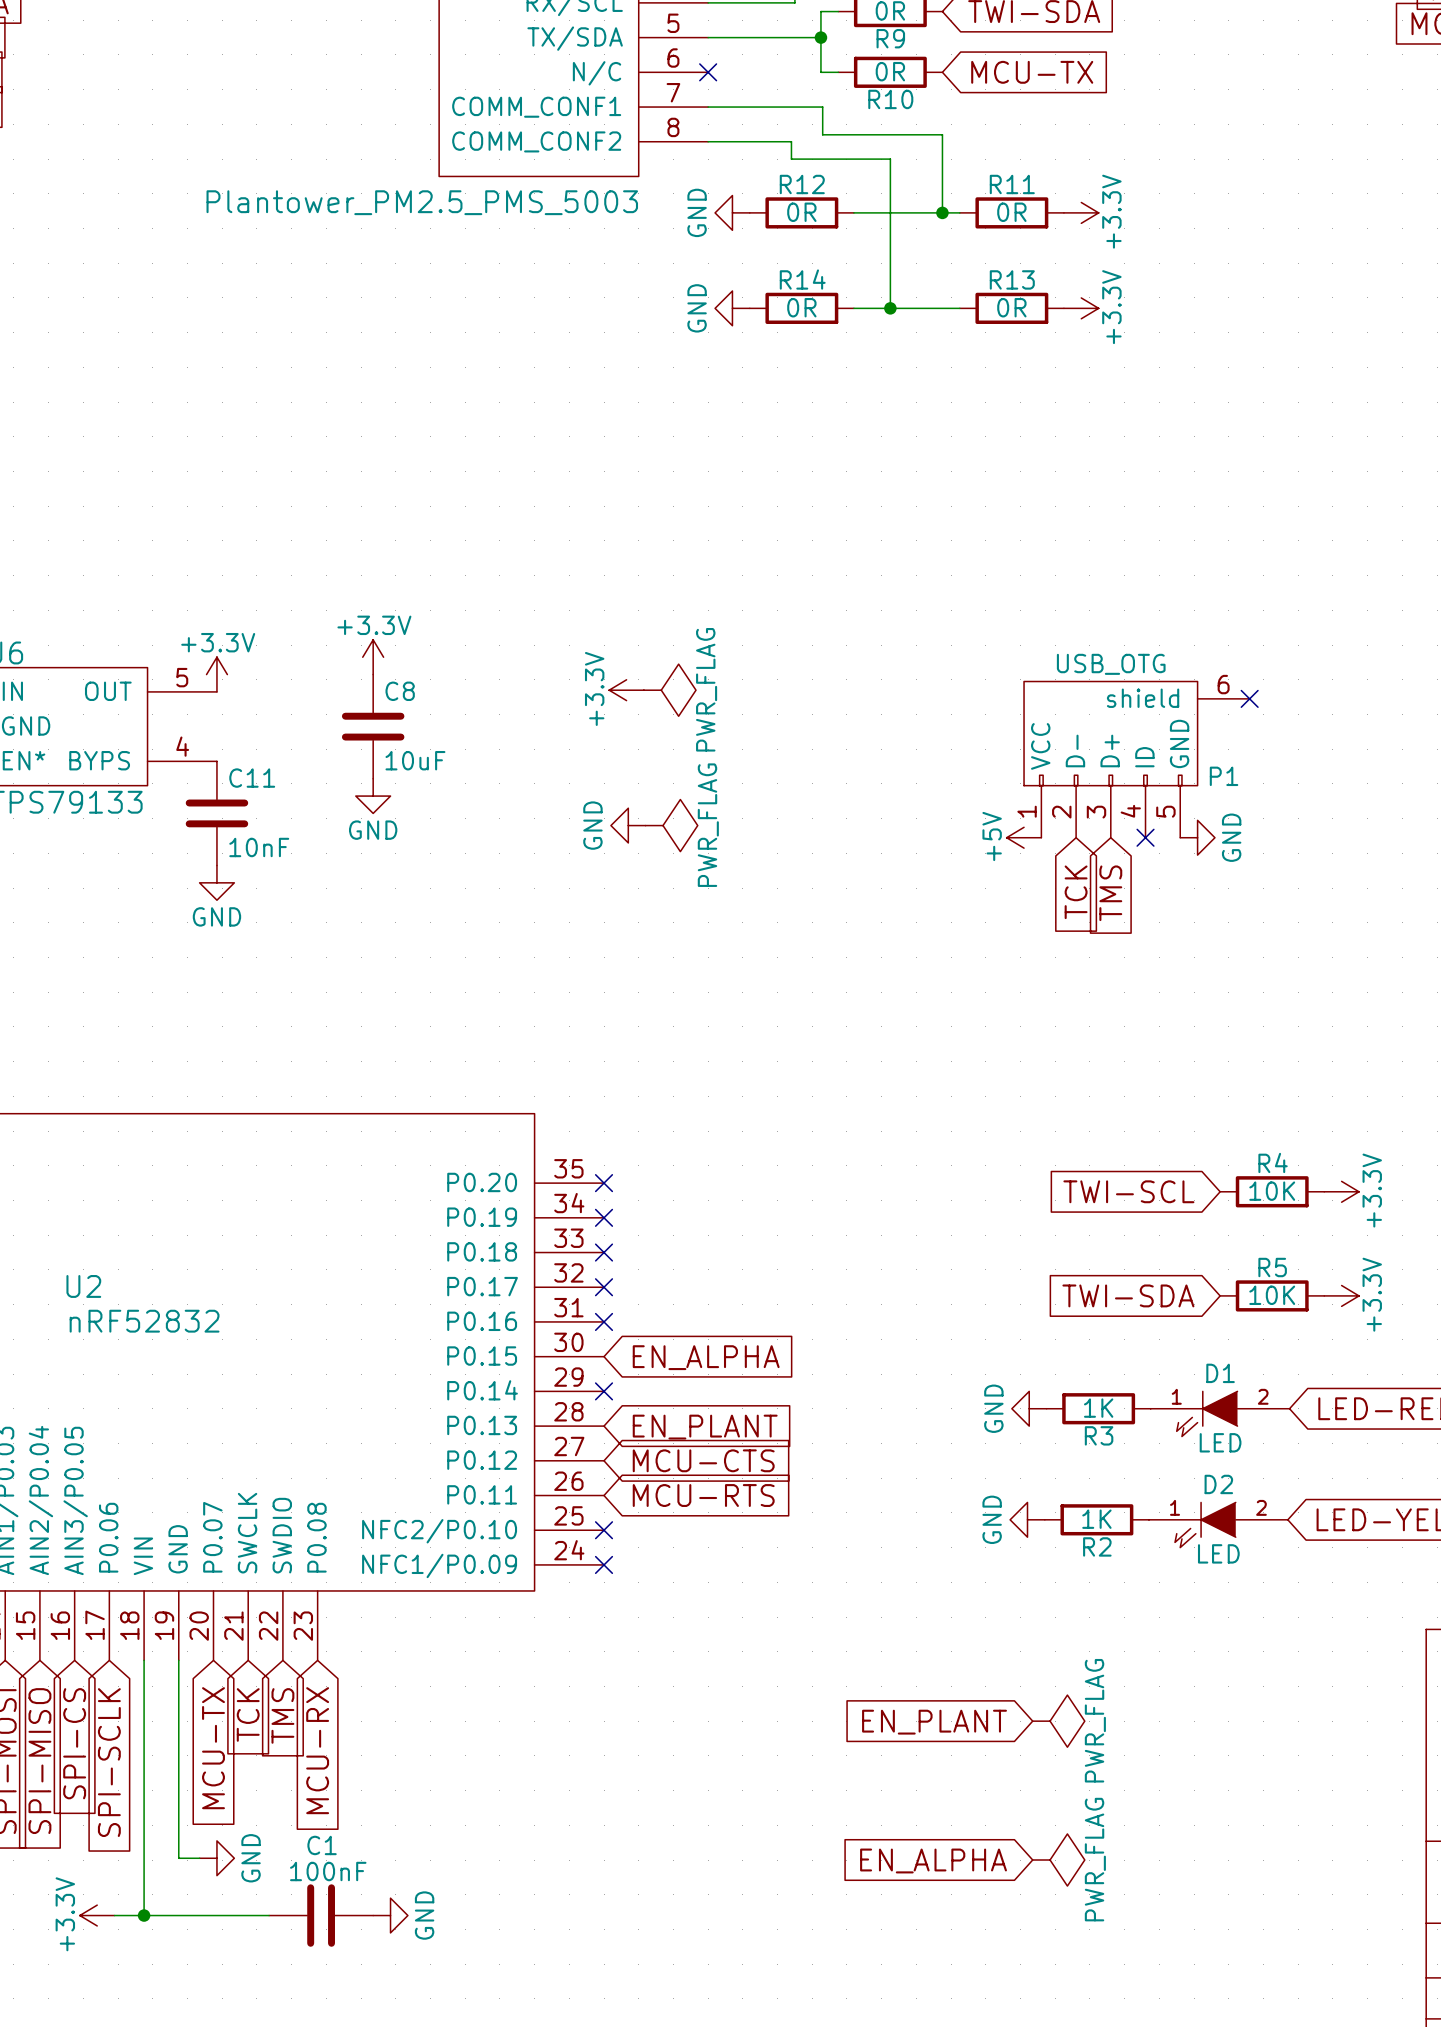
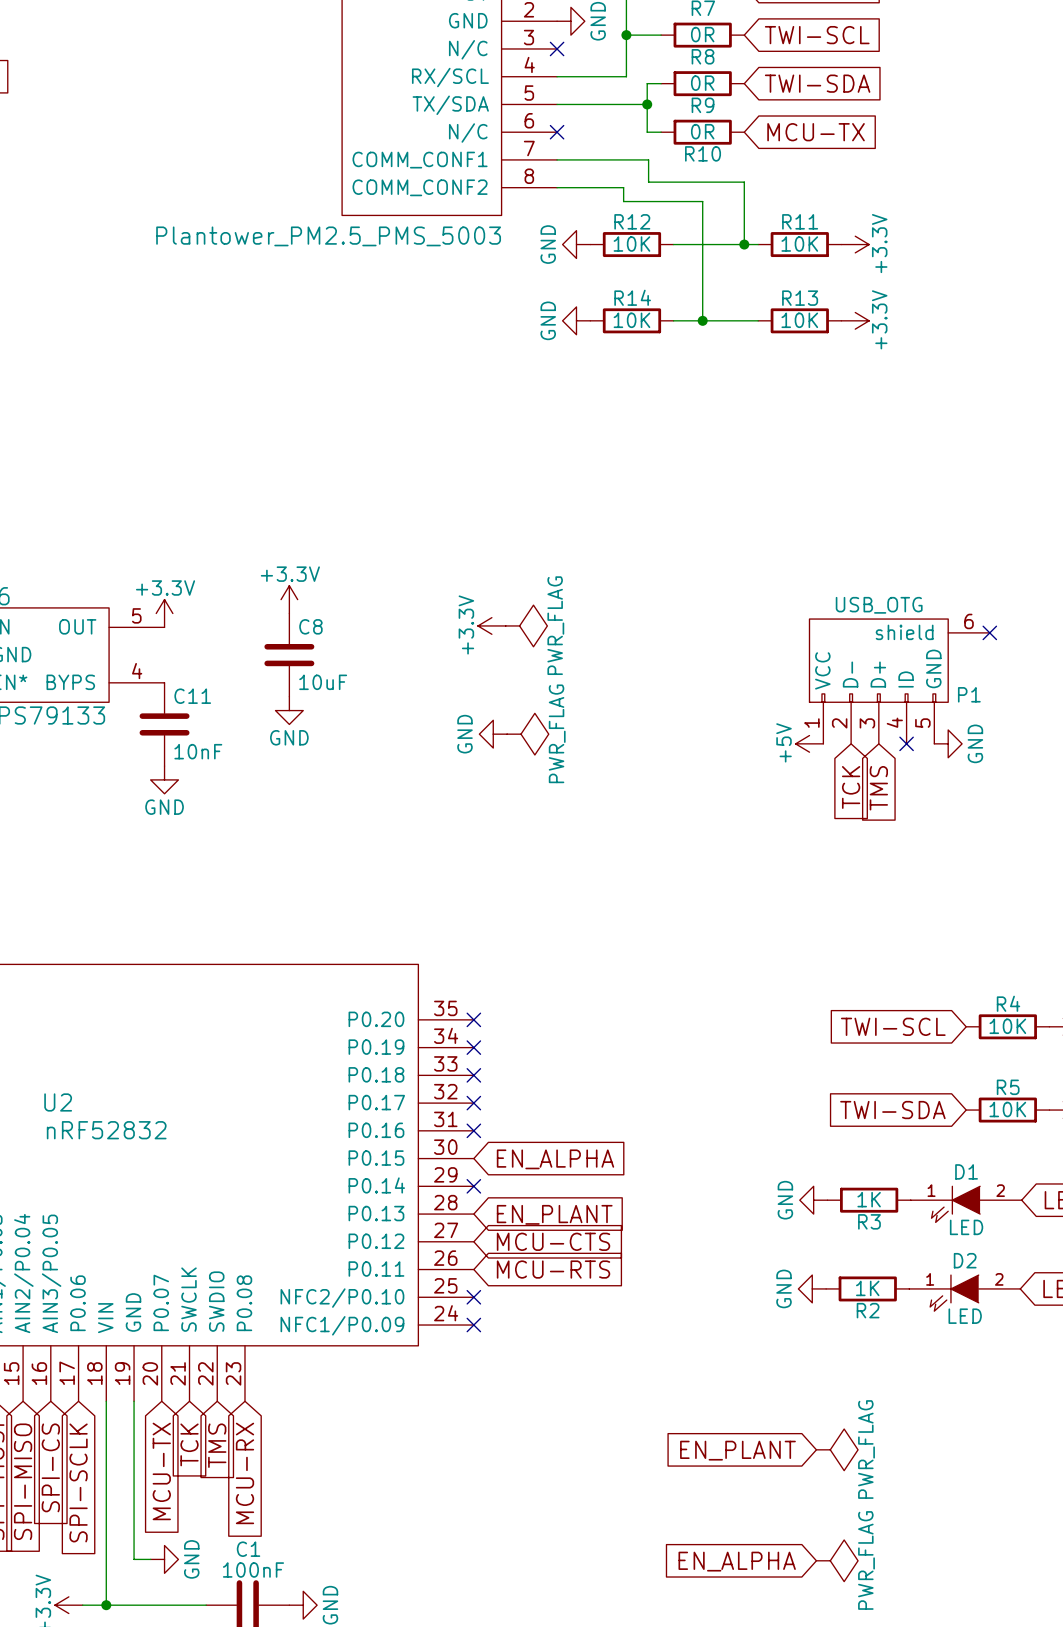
R12 value: 0R (801, 212) -> 10K (631, 244)
R11 value: 0R (1011, 212) -> 10K (799, 244)
R14 value: 0R (801, 307) -> 10K (631, 320)
R13 value: 0R (1011, 307) -> 10K (799, 320)

